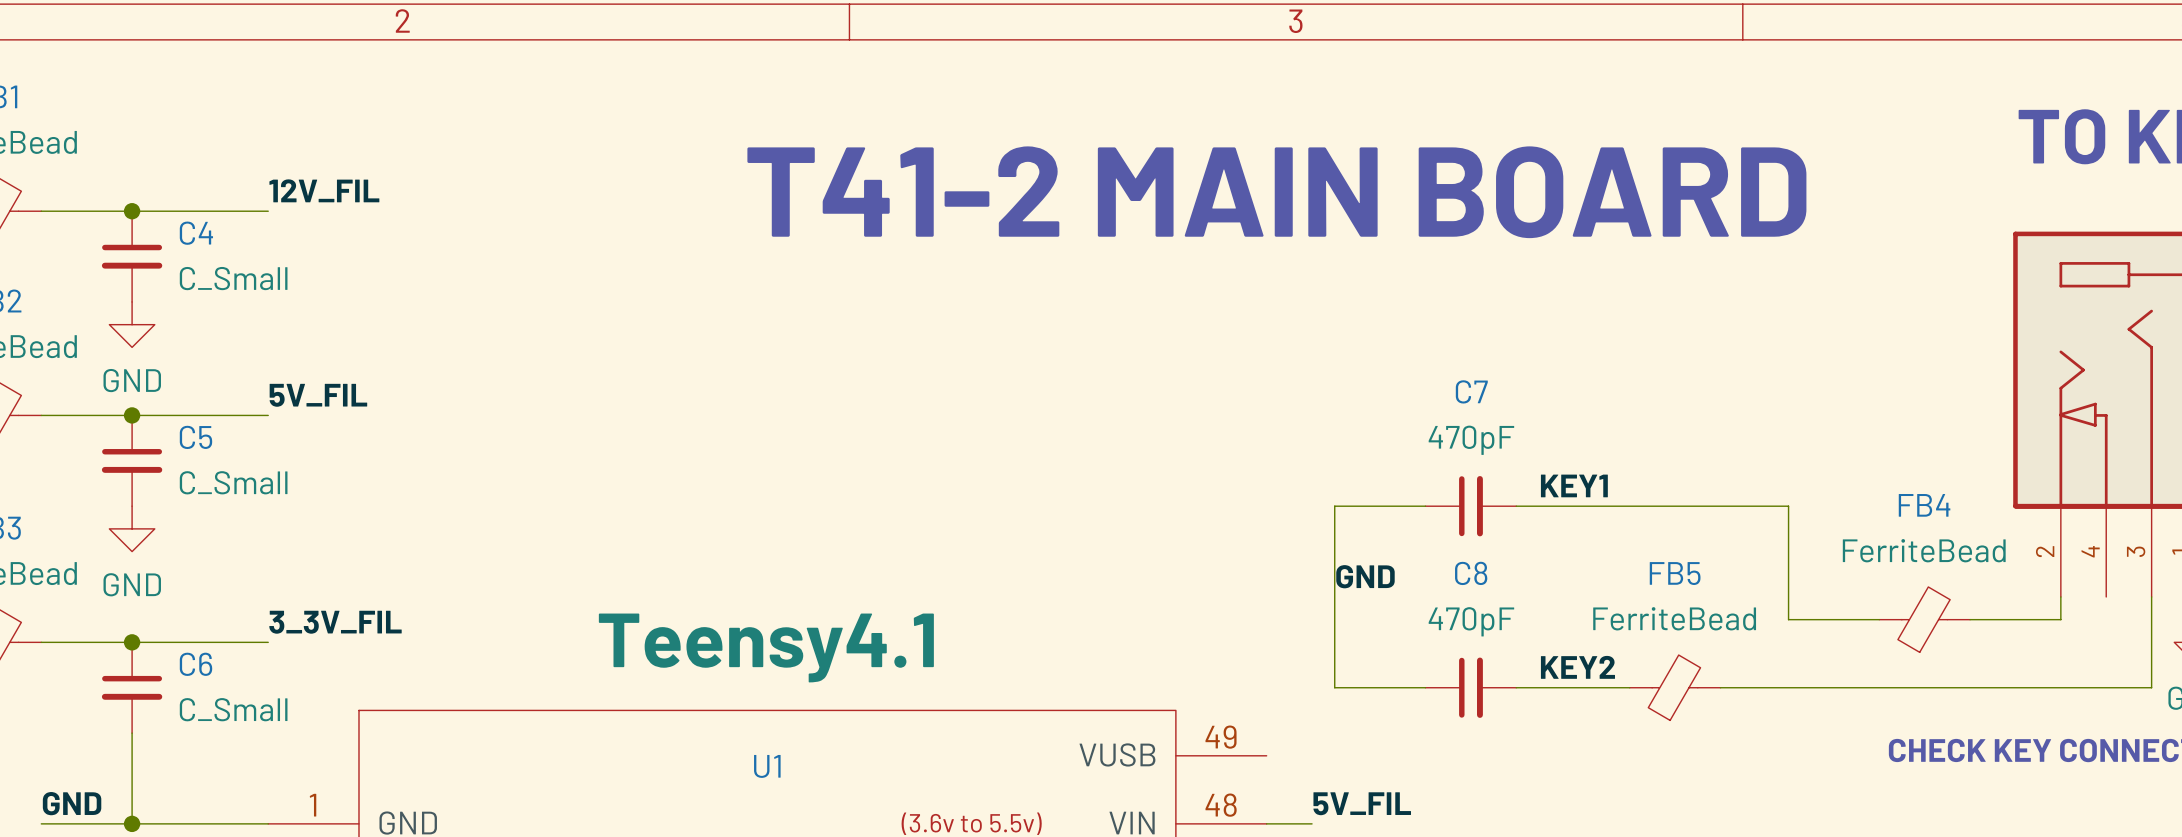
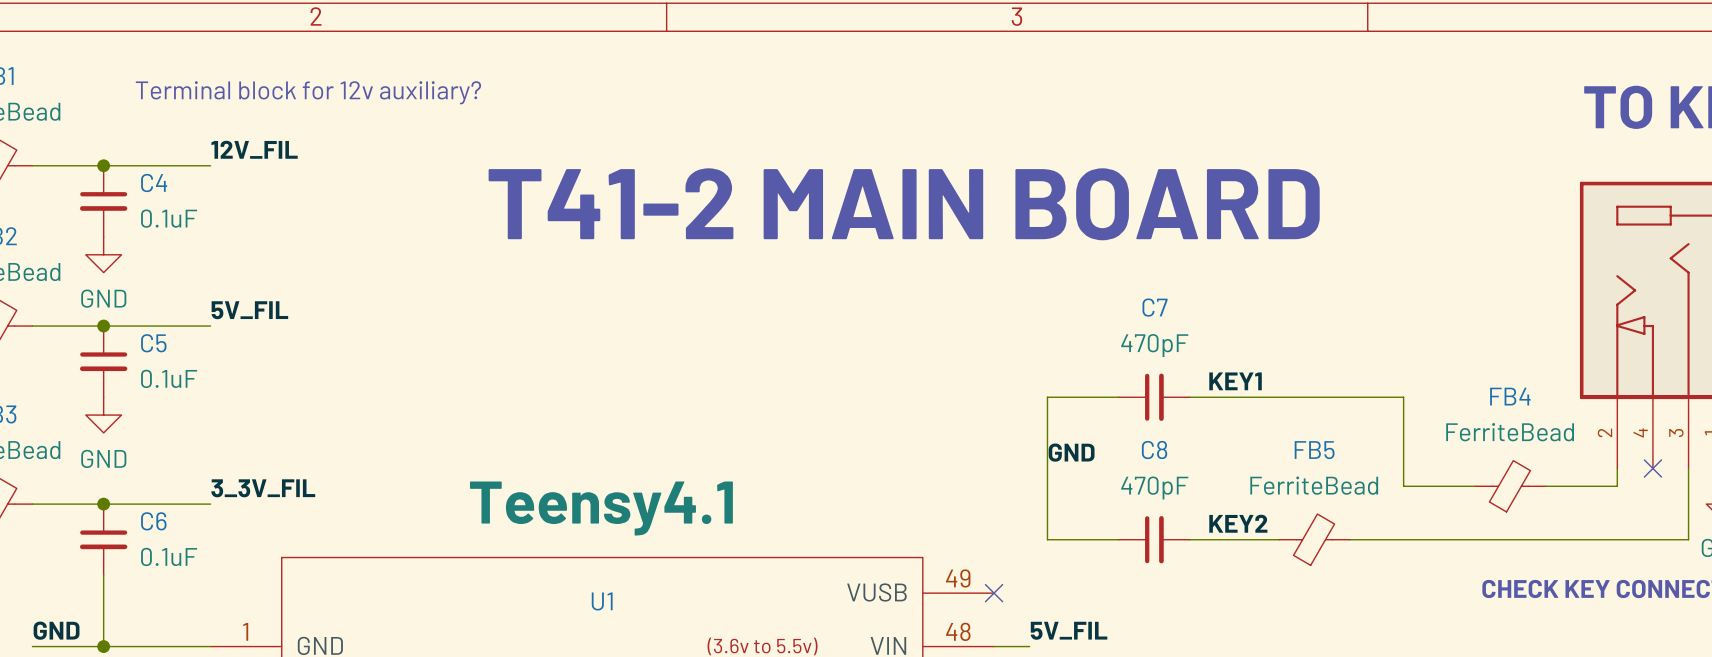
text: none -> Terminal block for 12v auxiliary? (308, 92)
text position: T41-2 MAIN BOARD (1276, 192) -> T41-2 MAIN BOARD (904, 204)
C4 value: C_Small (233, 278) -> 0.1uF (169, 218)
C5 value: C_Small (233, 482) -> 0.1uF (169, 378)
no-connect mark: none -> (1652, 468)
C6 value: C_Small (233, 709) -> 0.1uF (169, 556)
no-connect mark: none -> (994, 593)

